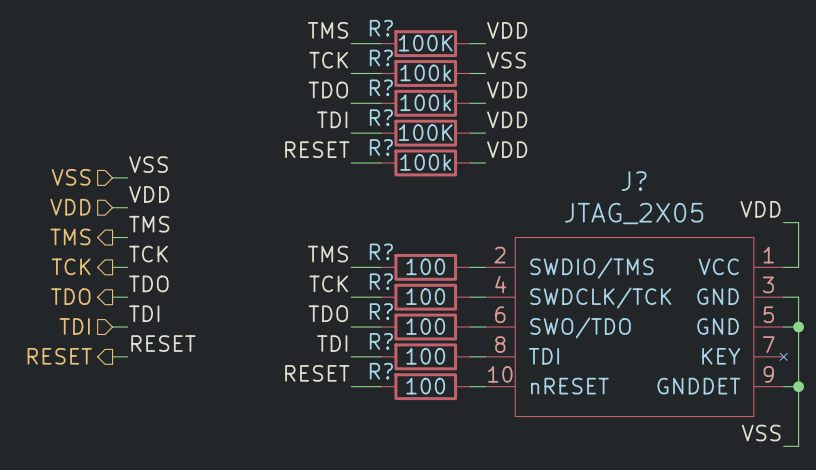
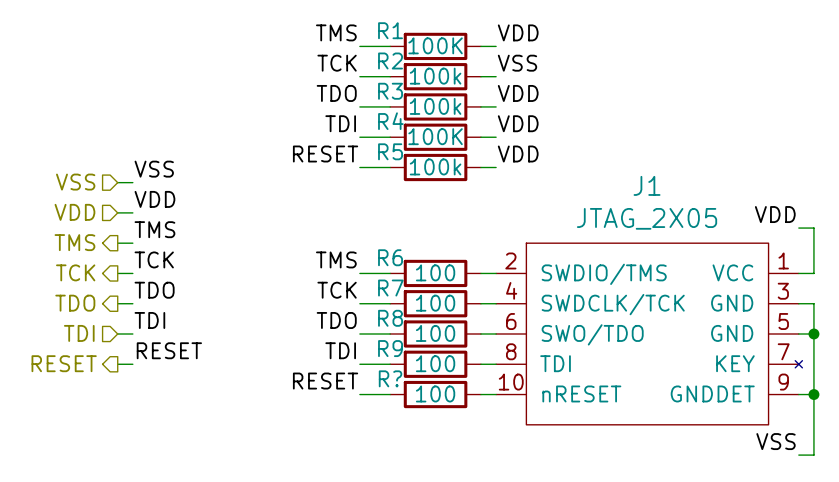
R? name: R? (381, 28) -> R1 (390, 30)
R? name: R? (381, 58) -> R2 (390, 60)
R? name: R? (381, 87) -> R3 (390, 91)
R? name: R? (381, 117) -> R4 (390, 121)
R? name: R? (381, 147) -> R5 (390, 151)
J? name: J? (634, 181) -> J1 (647, 185)
R? name: R? (381, 251) -> R6 (390, 257)
R? name: R? (381, 281) -> R7 (390, 288)
R? name: R? (381, 311) -> R8 (390, 318)
R? name: R? (381, 341) -> R9 (390, 348)

